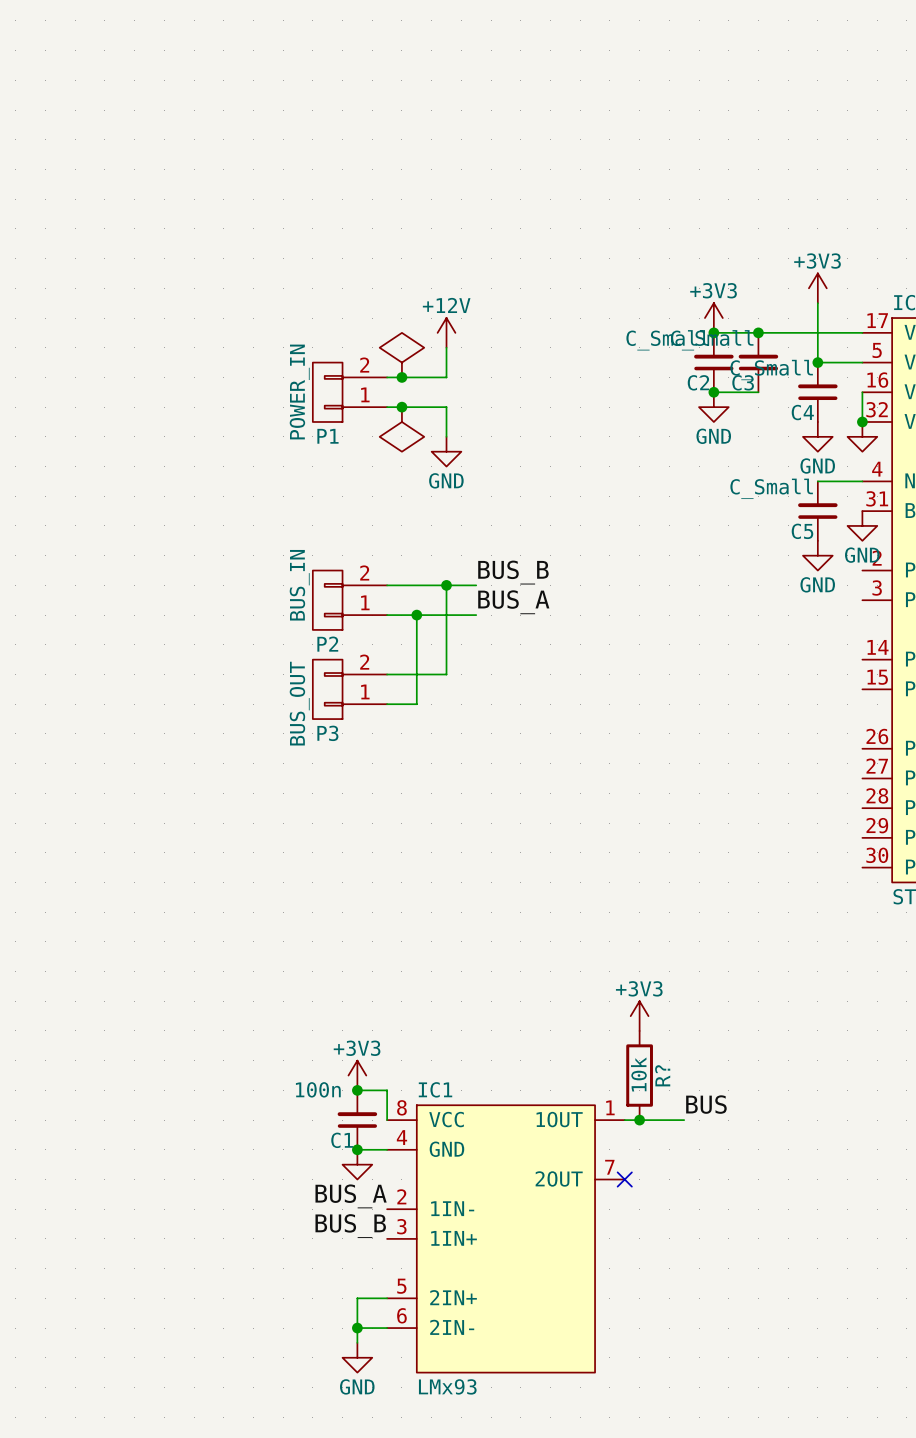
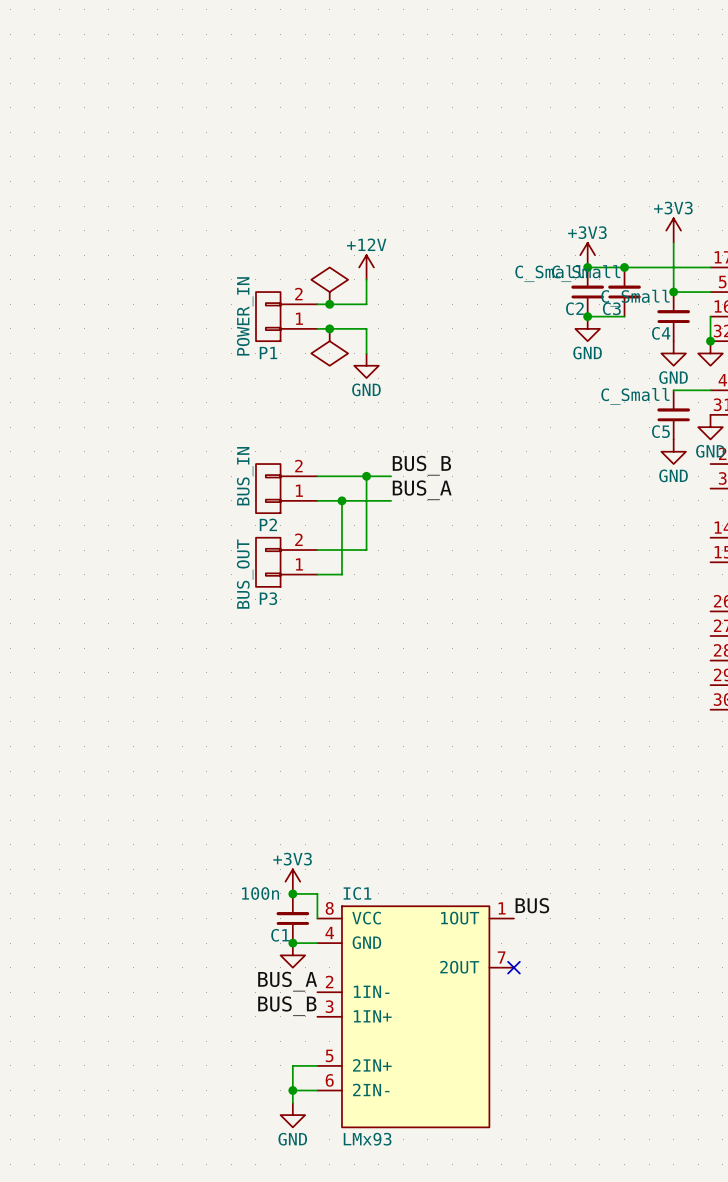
power symbol: +3V3 (639, 1016) -> none
R?: 10k (639, 1075) -> none
label position: BUS (706, 1104) -> BUS (532, 905)
wire: (624, 1120) (684, 1120) -> none
junction: (639, 1120) -> none

